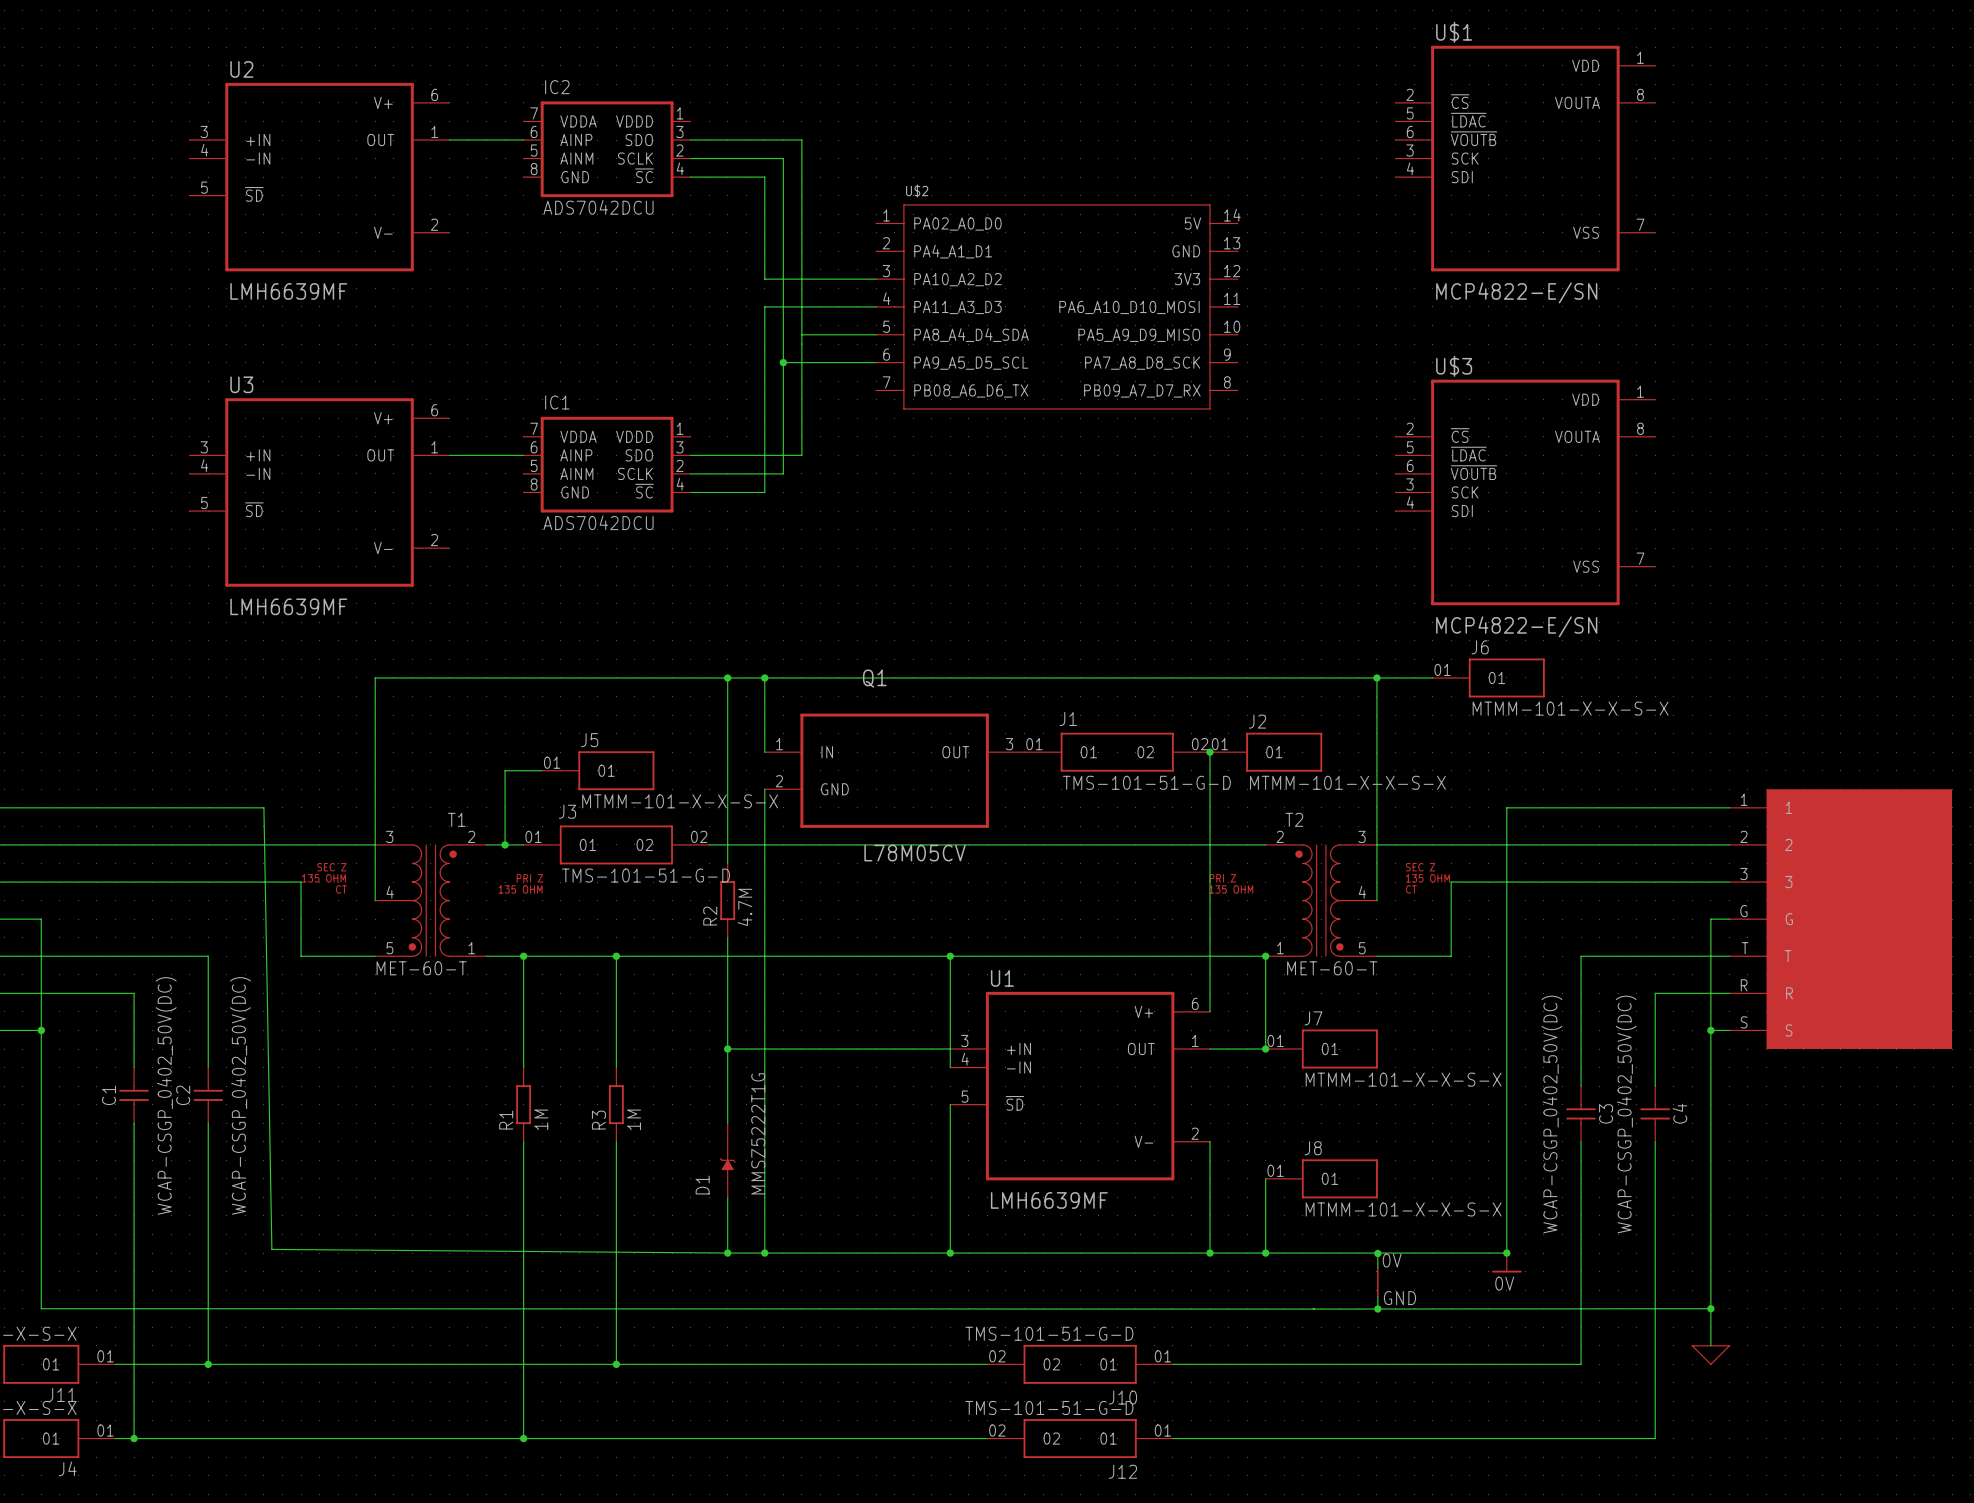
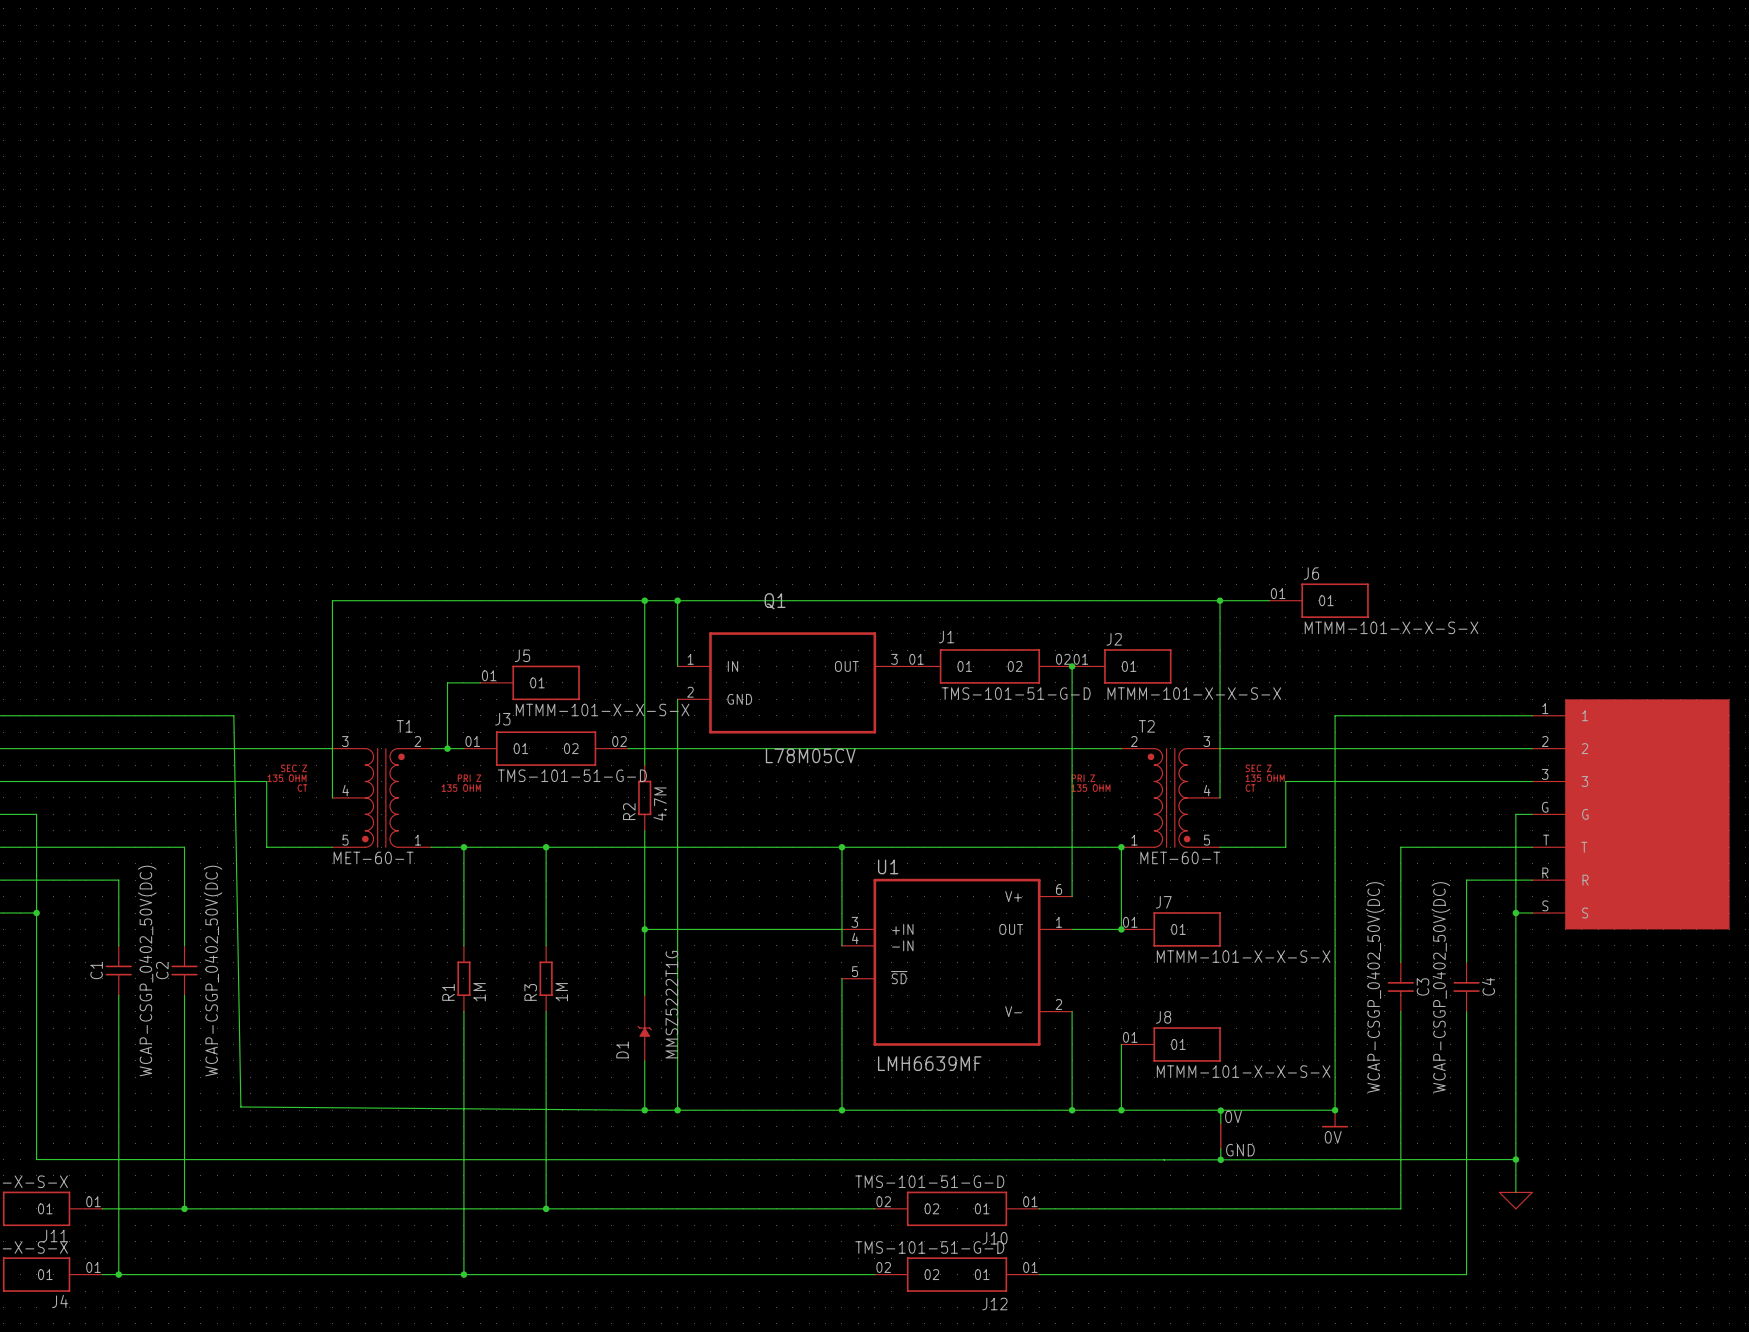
wire: (449, 140) (523, 140) -> none
wire: (690, 140) (801, 140) (801, 455) (690, 455) -> none
IC2: ADS7042DCU (607, 149) -> none
wire: (690, 158) (783, 158) (783, 473) (690, 473) -> none
U$1: MCP4822-E/SN (1525, 158) -> none
U2: LMH6639MF (319, 177) -> none
wire: (690, 177) (764, 177) (764, 279) (876, 279) -> none
wire: (876, 306) (764, 306) (764, 492) (690, 492) -> none
U$2: (1056, 306) -> none
wire: (801, 334) (876, 334) -> none
wire: (783, 362) (876, 362) -> none
junction: (783, 362) -> none
wire: (449, 455) (523, 455) -> none
IC1: ADS7042DCU (607, 464) -> none
U3: LMH6639MF (319, 492) -> none
U$3: MCP4822-E/SN (1525, 492) -> none

